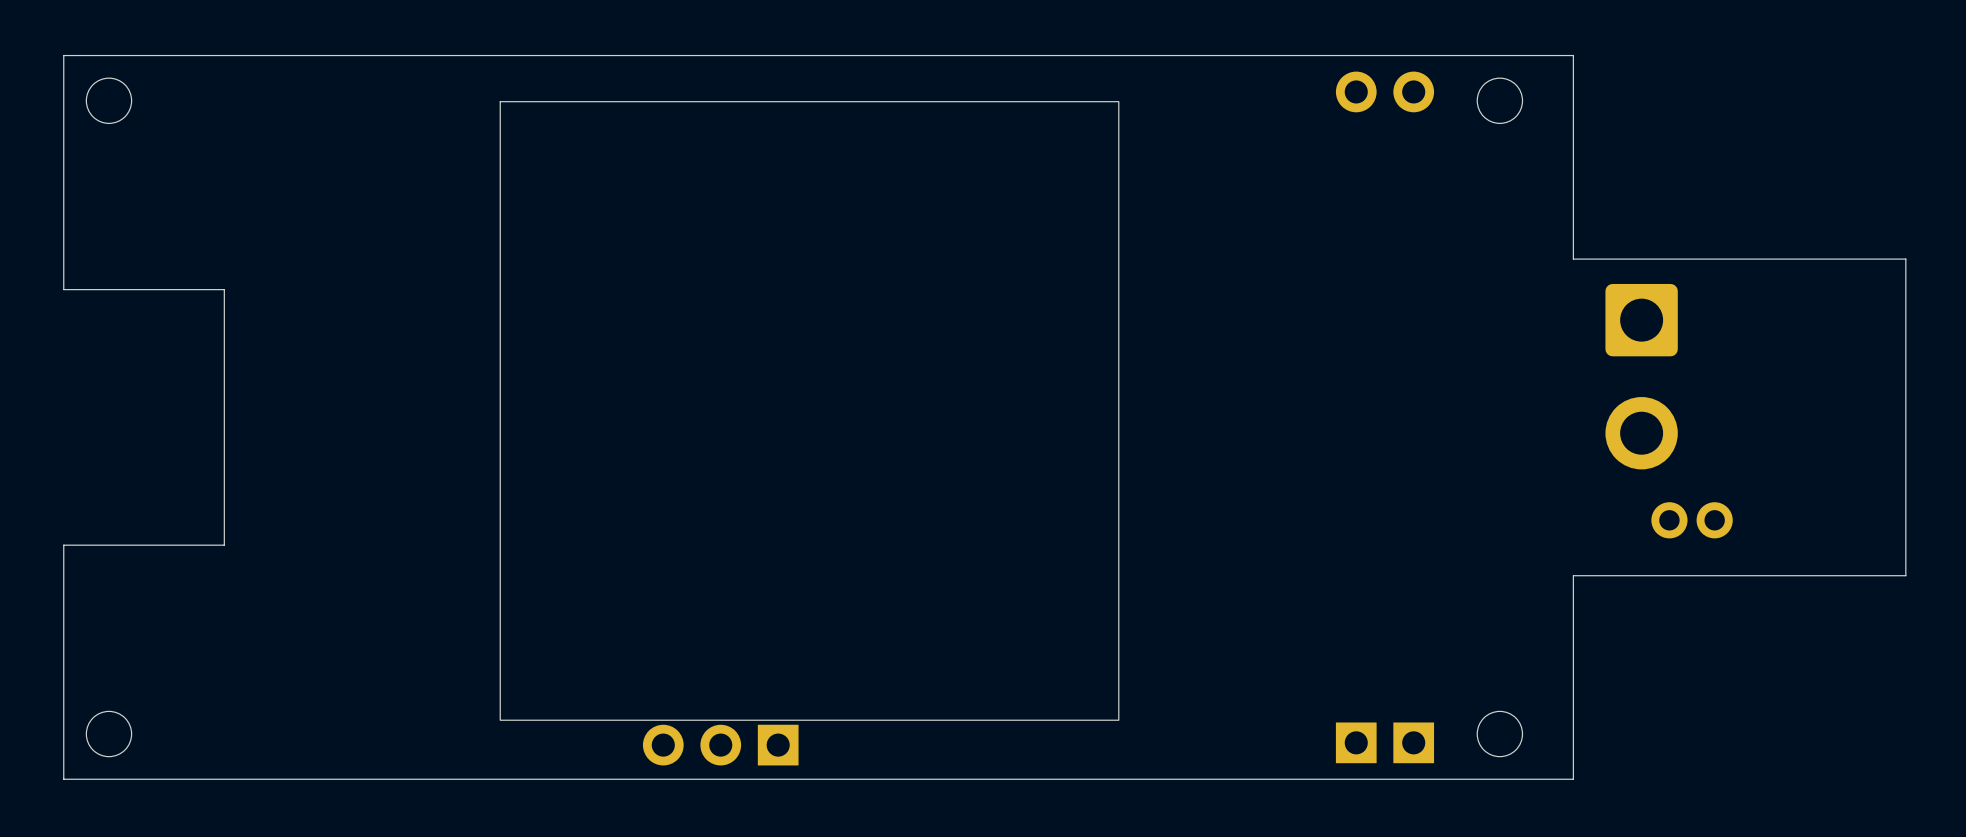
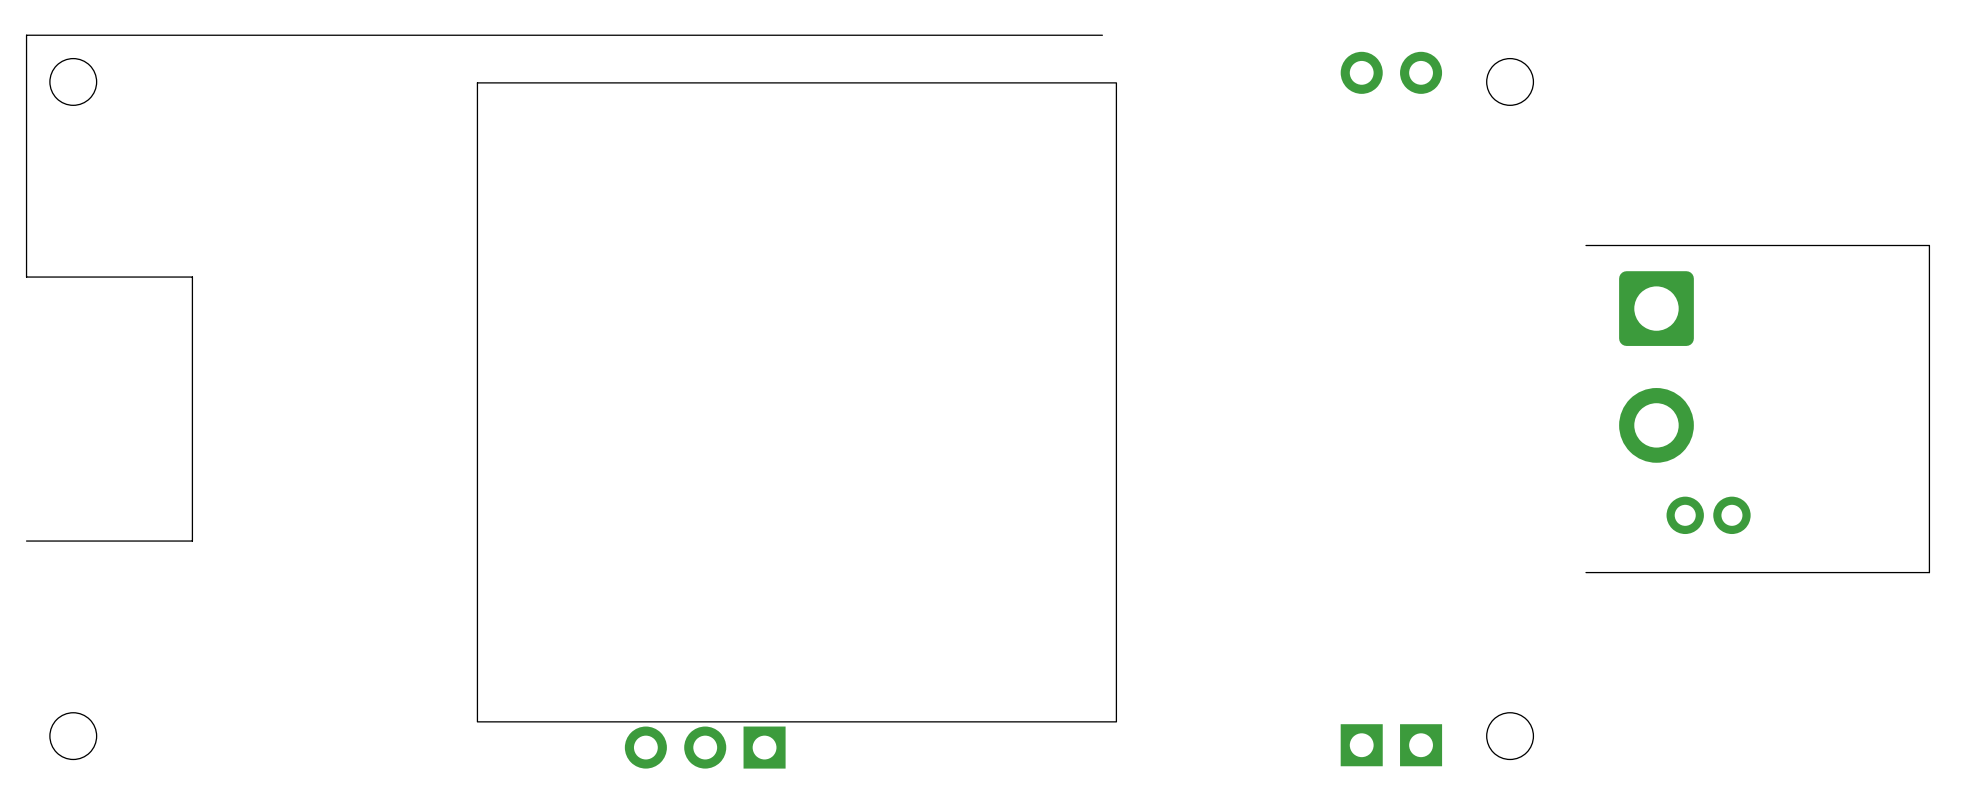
board edge: (1105, 55) (1573, 55) (1573, 259) -> none
board edge: (63, 545) (63, 779) (1573, 779) (1573, 575) -> none

